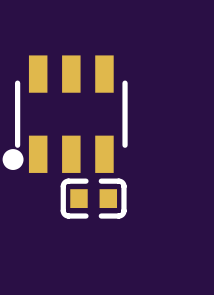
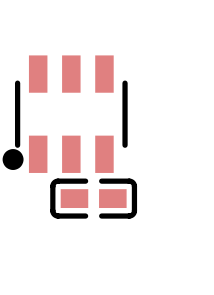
part footprint: [60, 178, 127, 219] -> [50, 178, 138, 219]

